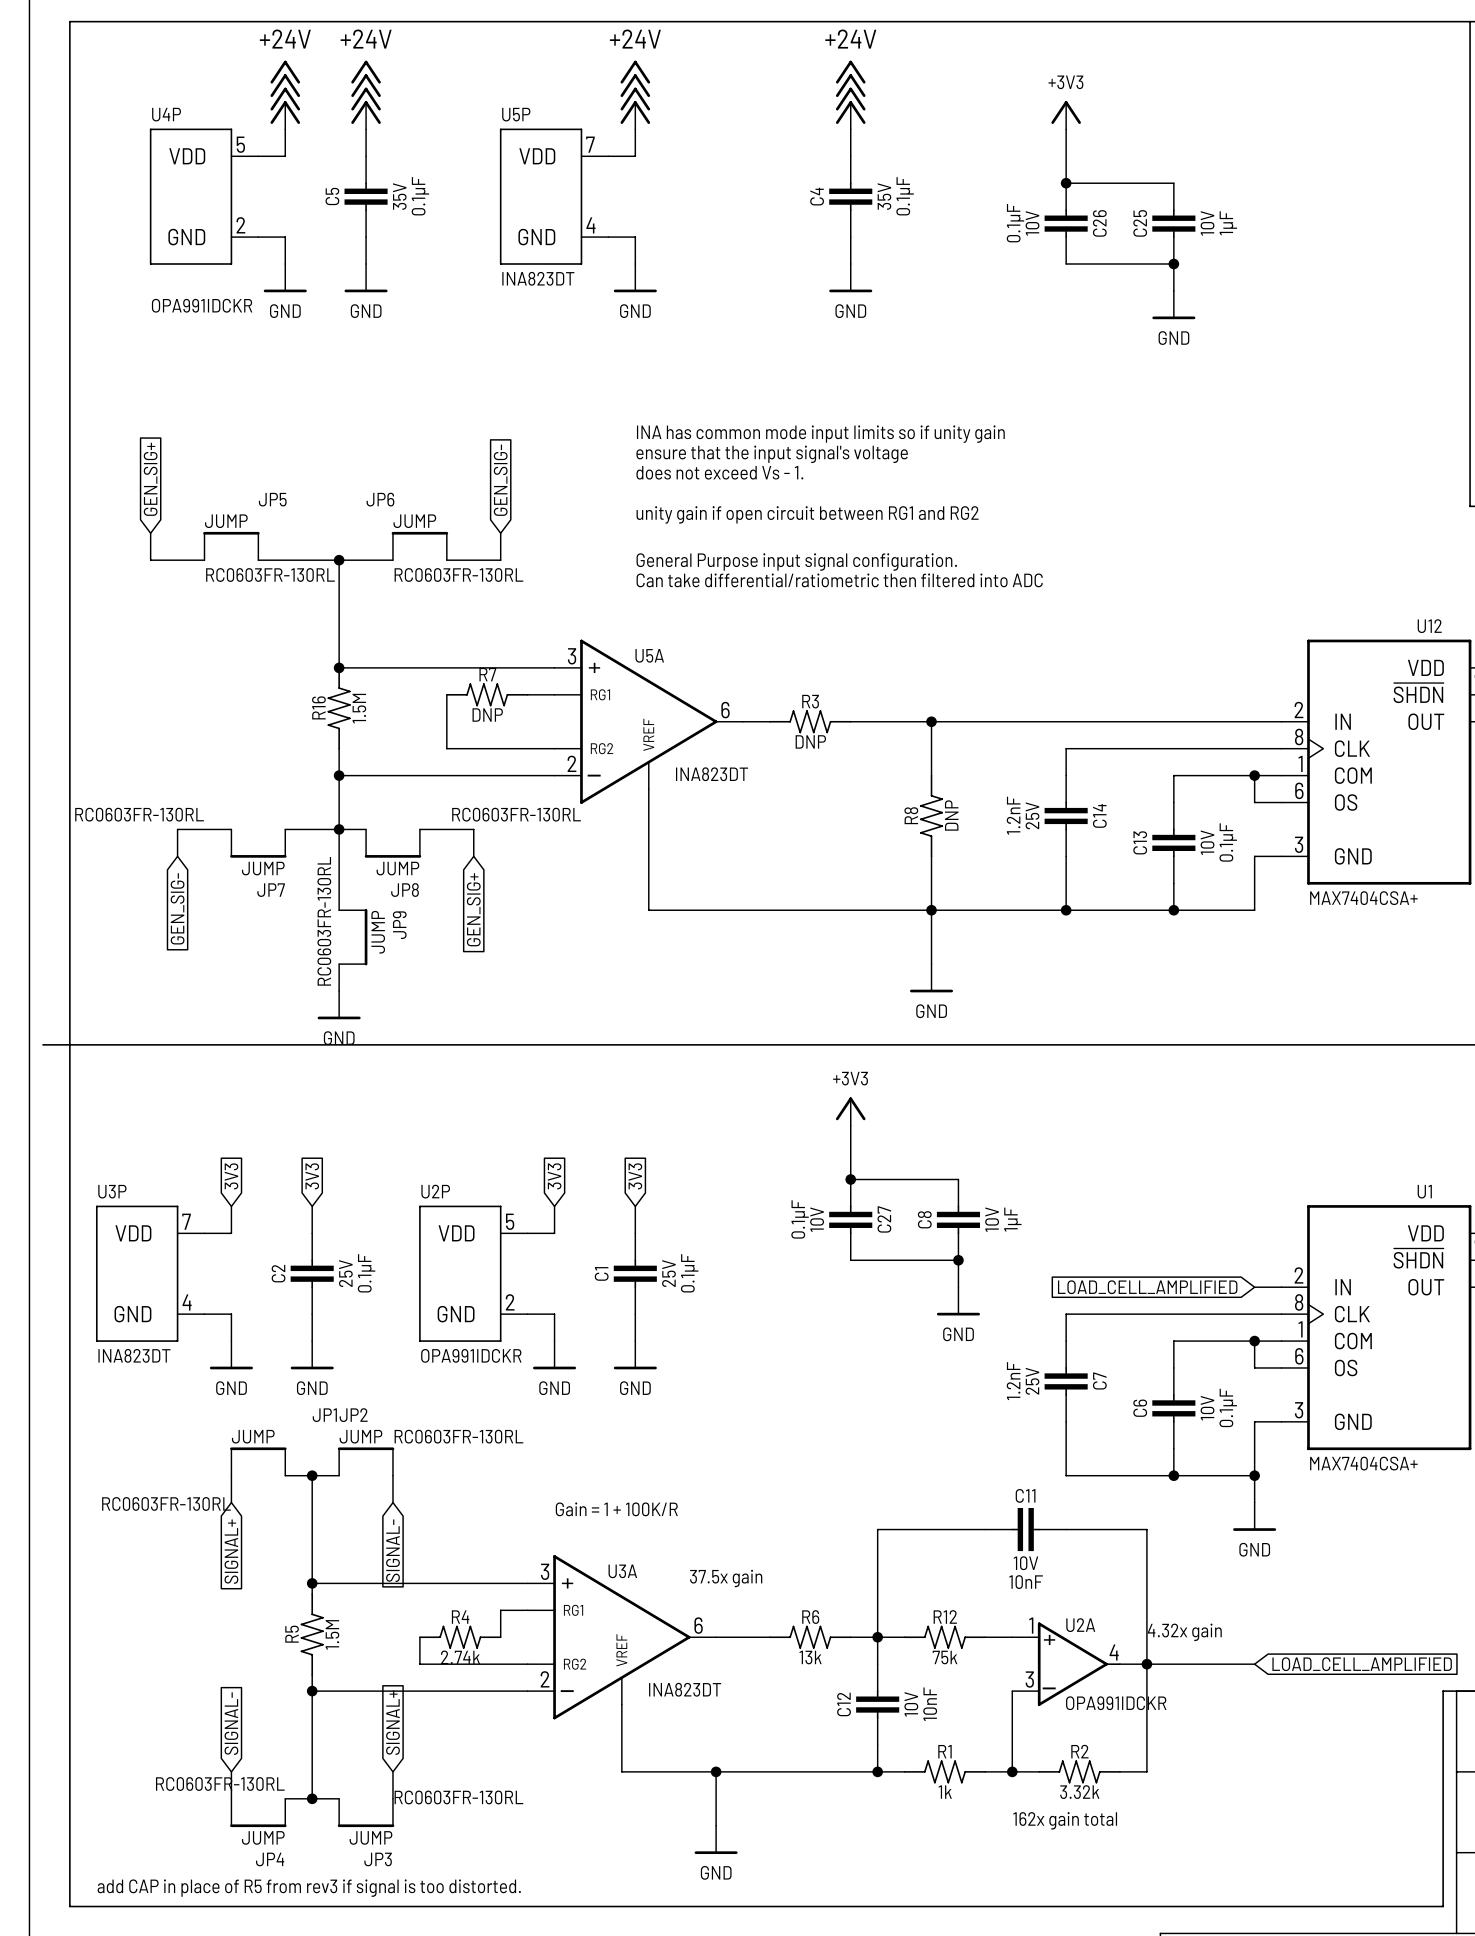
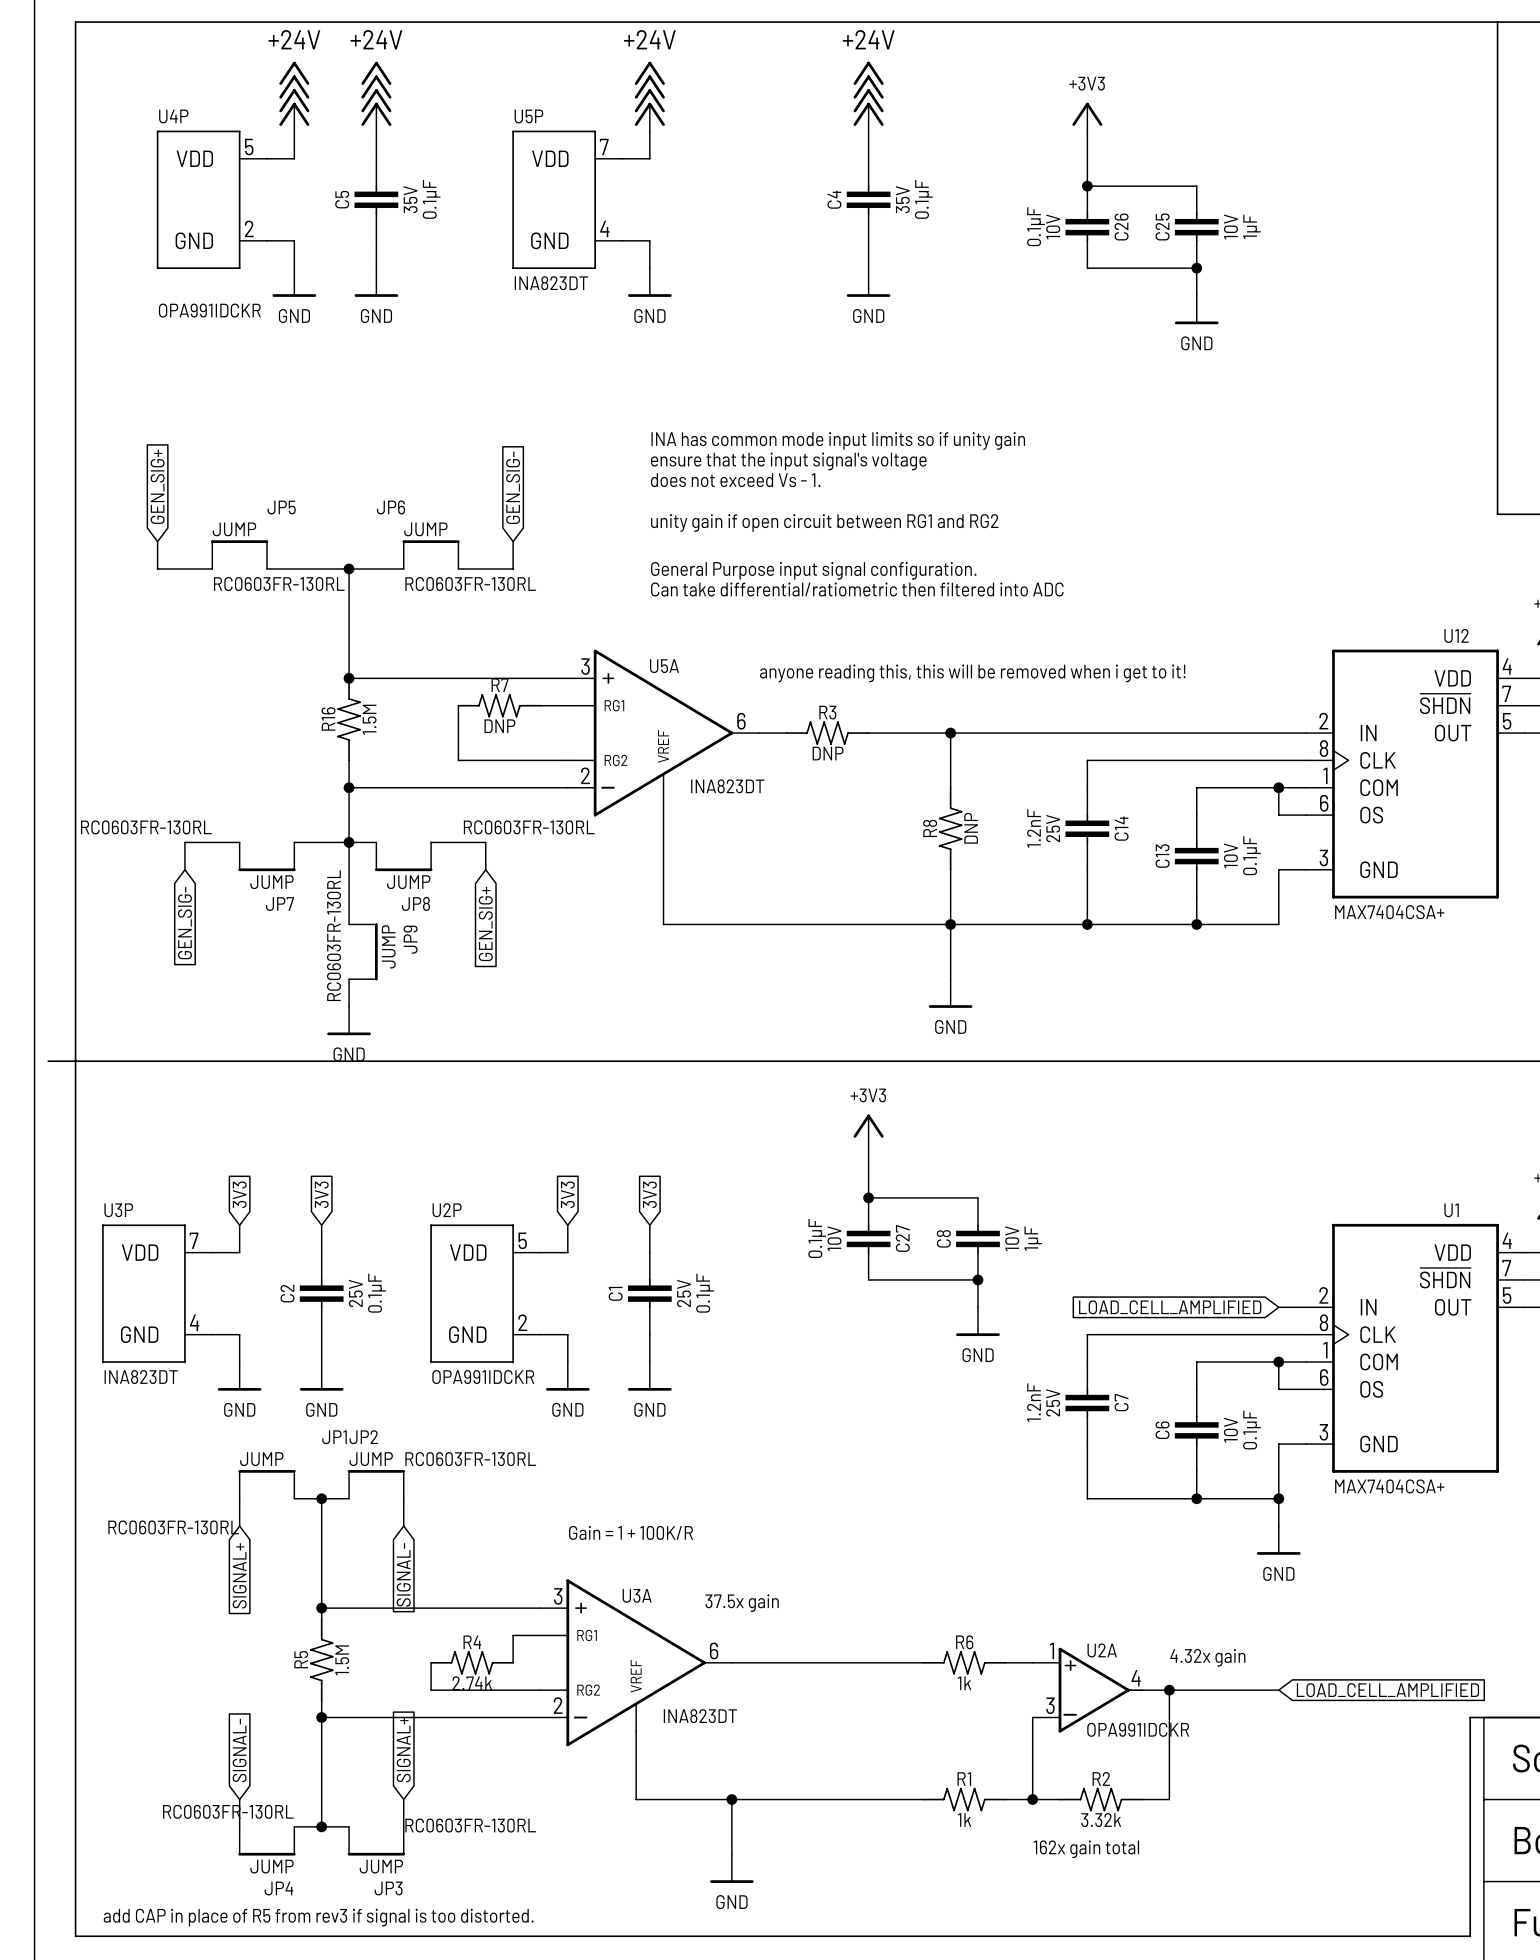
text: none -> anyone reading this, this will be removed when i get to it! (972, 673)
wire: (985, 1529) (877, 1529) (877, 1664) -> none
C11: (1025, 1529) -> none
wire: (1066, 1529) (1146, 1529) (1146, 1664) -> none
R12 name: R12 (945, 1616) -> R6 (964, 1642)
R6: (810, 1637) -> none
junction: (877, 1637) -> none
R12 text: 75k (945, 1657) -> 1k (964, 1683)
C12: (877, 1704) -> none
wire: (877, 1744) (877, 1771) -> none
junction: (877, 1771) -> none

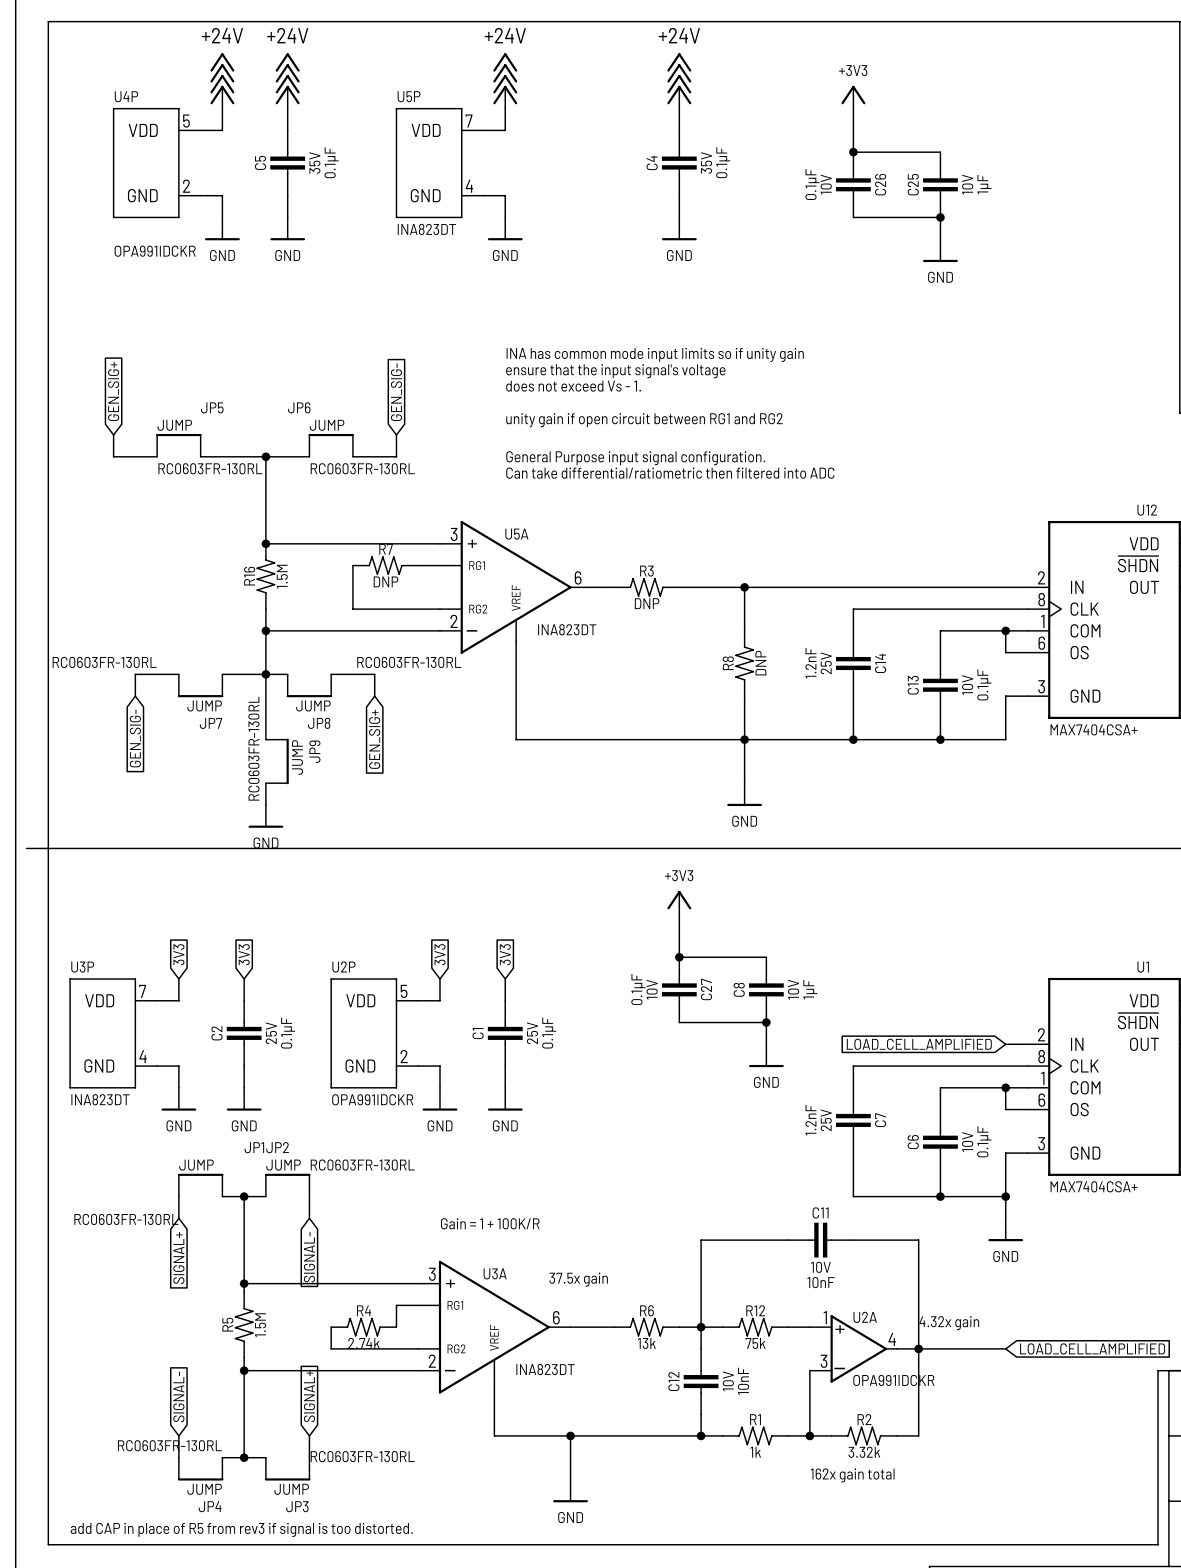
text: anyone reading this, this will be removed when i get to it! (972, 673) -> none
wire: none -> (788, 1240) (701, 1240) (701, 1348)
C11: none -> (820, 1240)
wire: none -> (853, 1240) (918, 1240) (918, 1348)
R6 name: R6 (964, 1642) -> R12 (755, 1310)
R6: none -> (646, 1327)
junction: none -> (701, 1327)
R6 text: 1k (964, 1683) -> 75k (755, 1343)
C12: none -> (701, 1381)
wire: none -> (701, 1414) (701, 1435)
junction: none -> (701, 1435)

